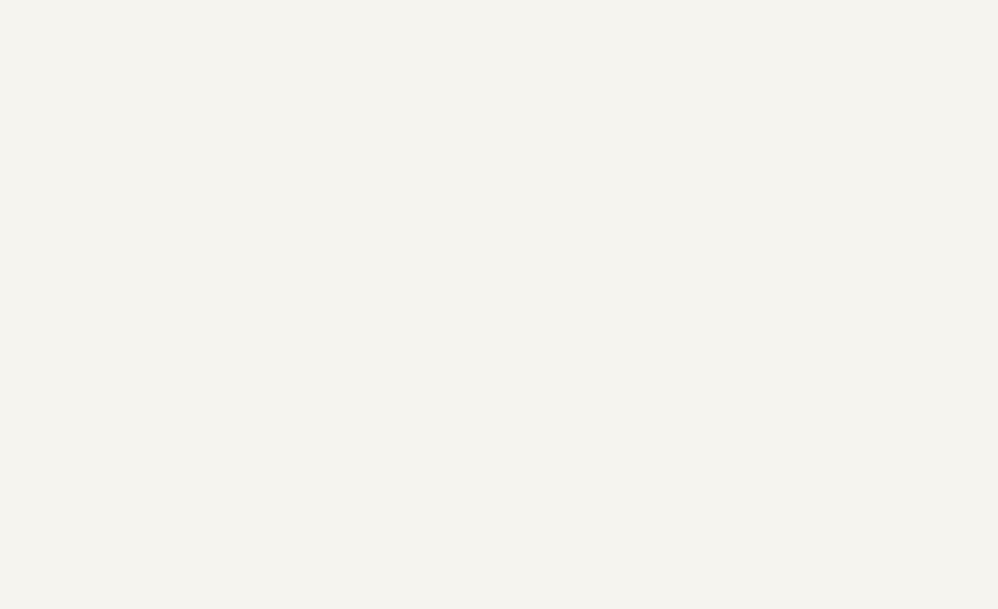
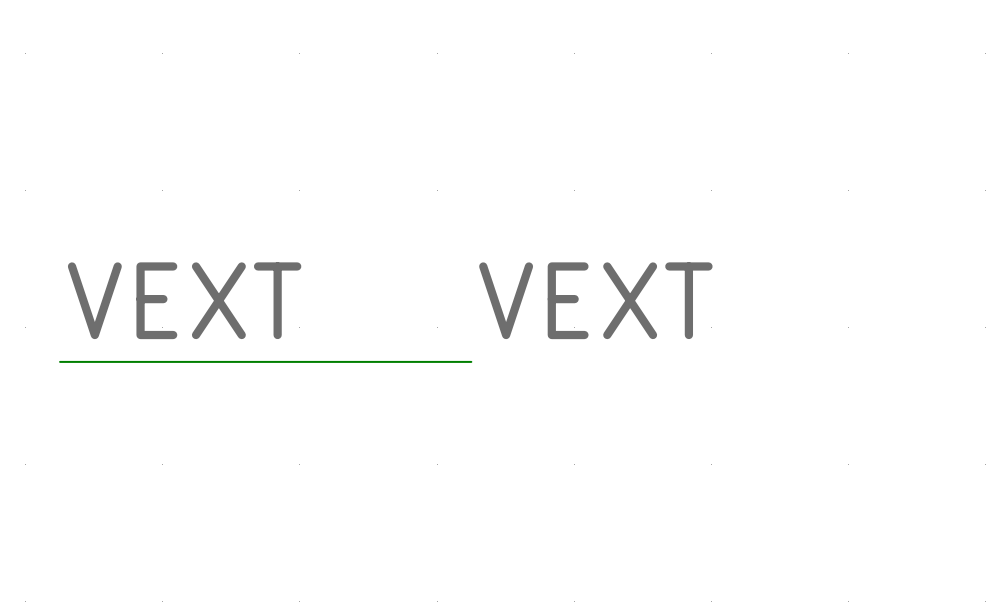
label: none -> VEXT (184, 300)
label: none -> VEXT (595, 300)
wire: none -> (60, 361) (471, 361)

